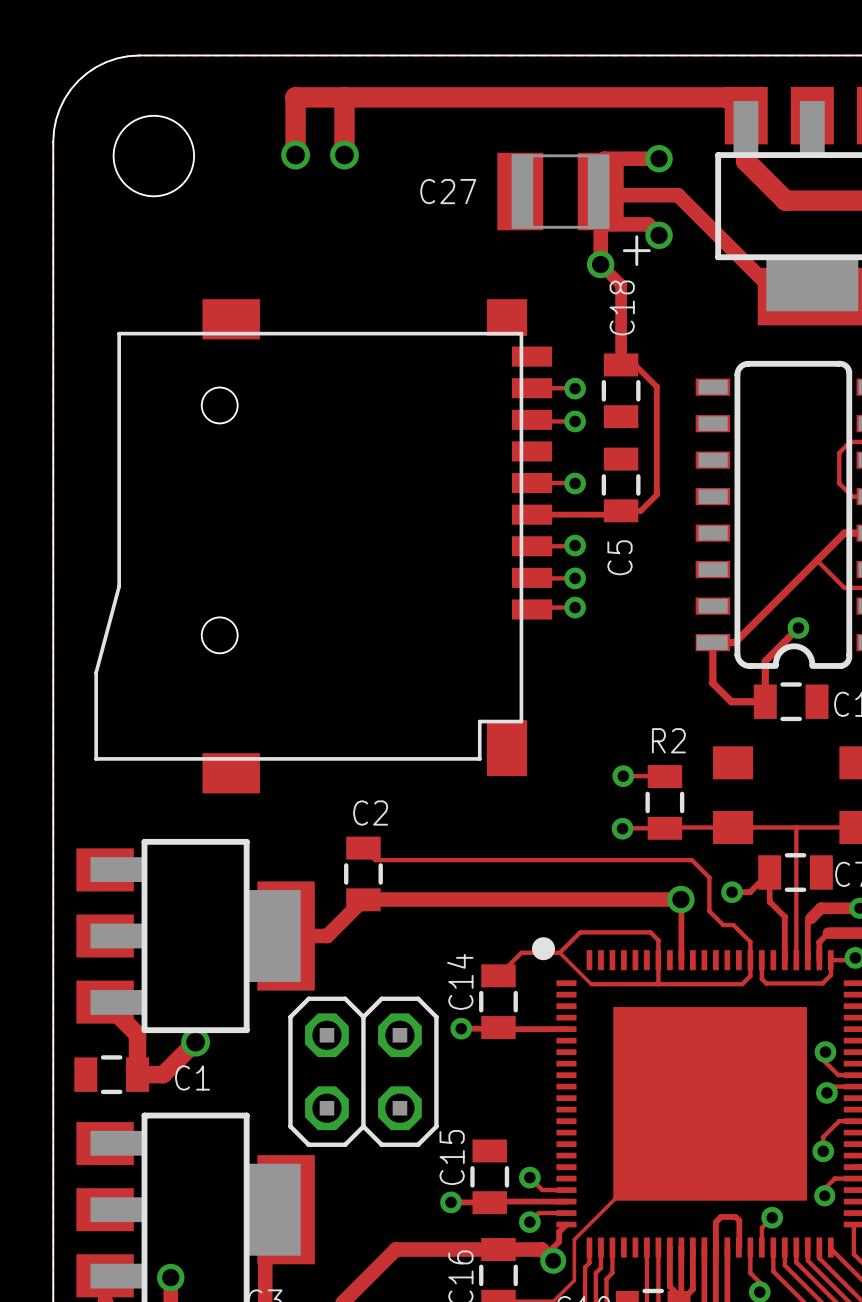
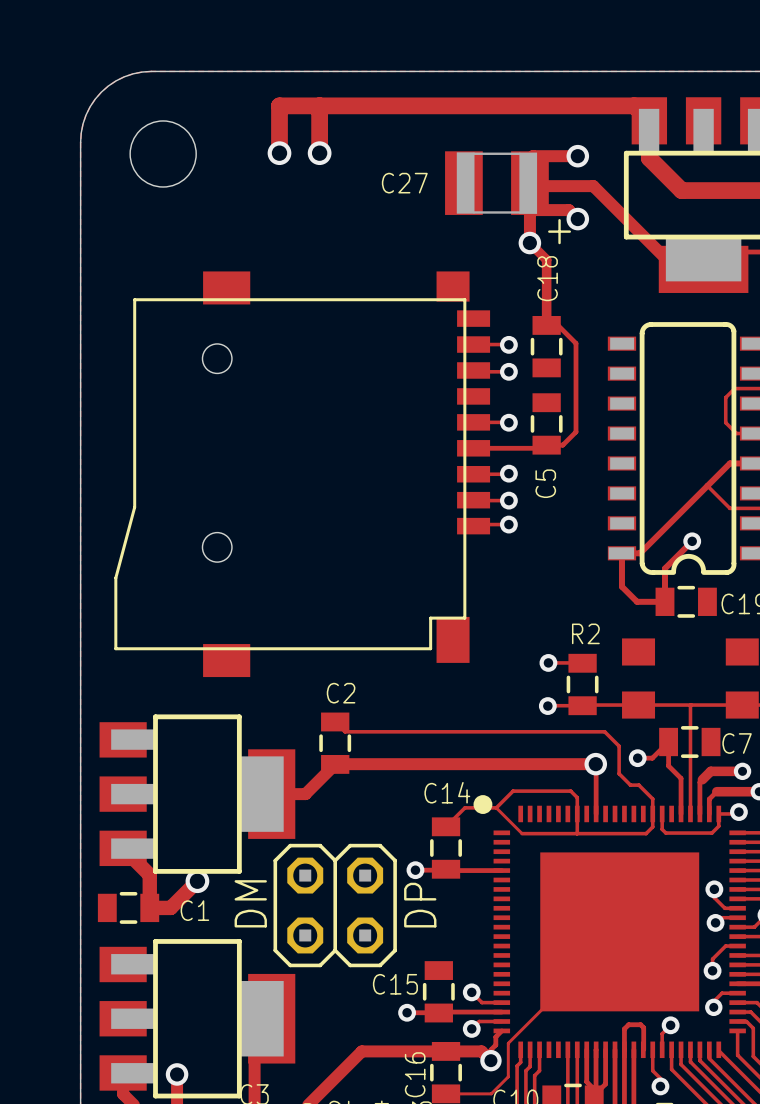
C14 name rotation: 0° (460, 981) -> 90° clockwise (447, 792)
text: none -> DM (250, 903)
text: none -> DP (420, 905)
C15 name rotation: 0° (452, 1157) -> 90° clockwise (395, 984)

